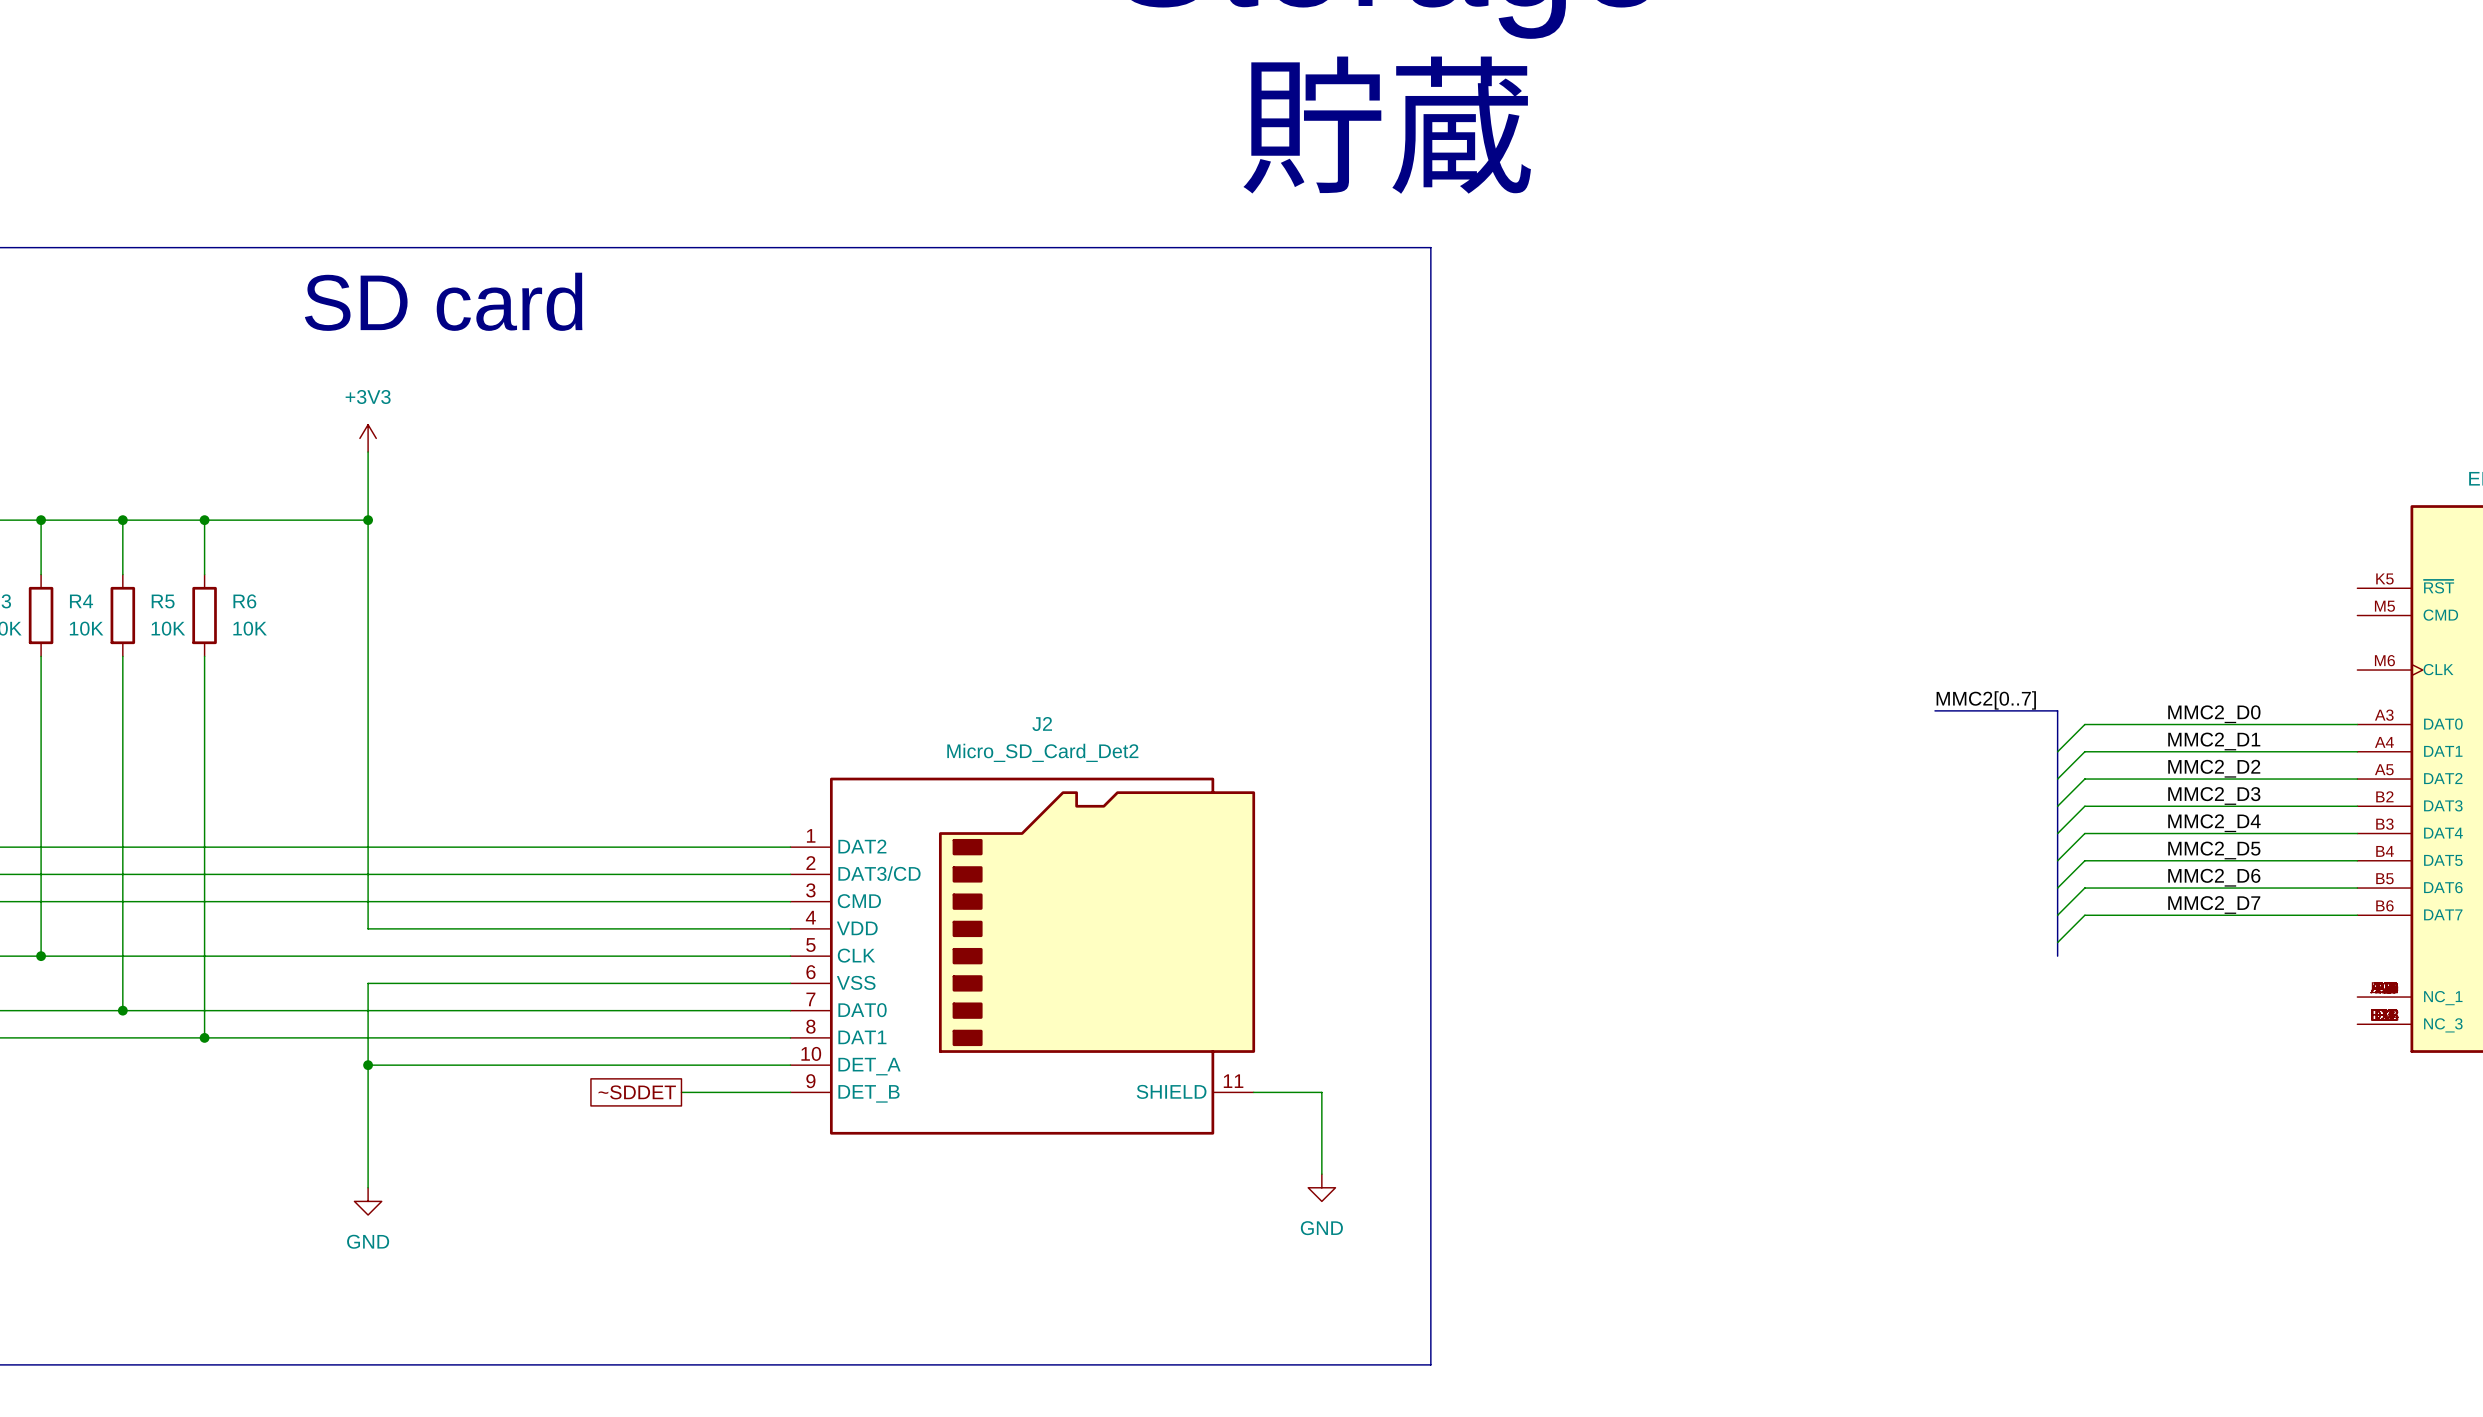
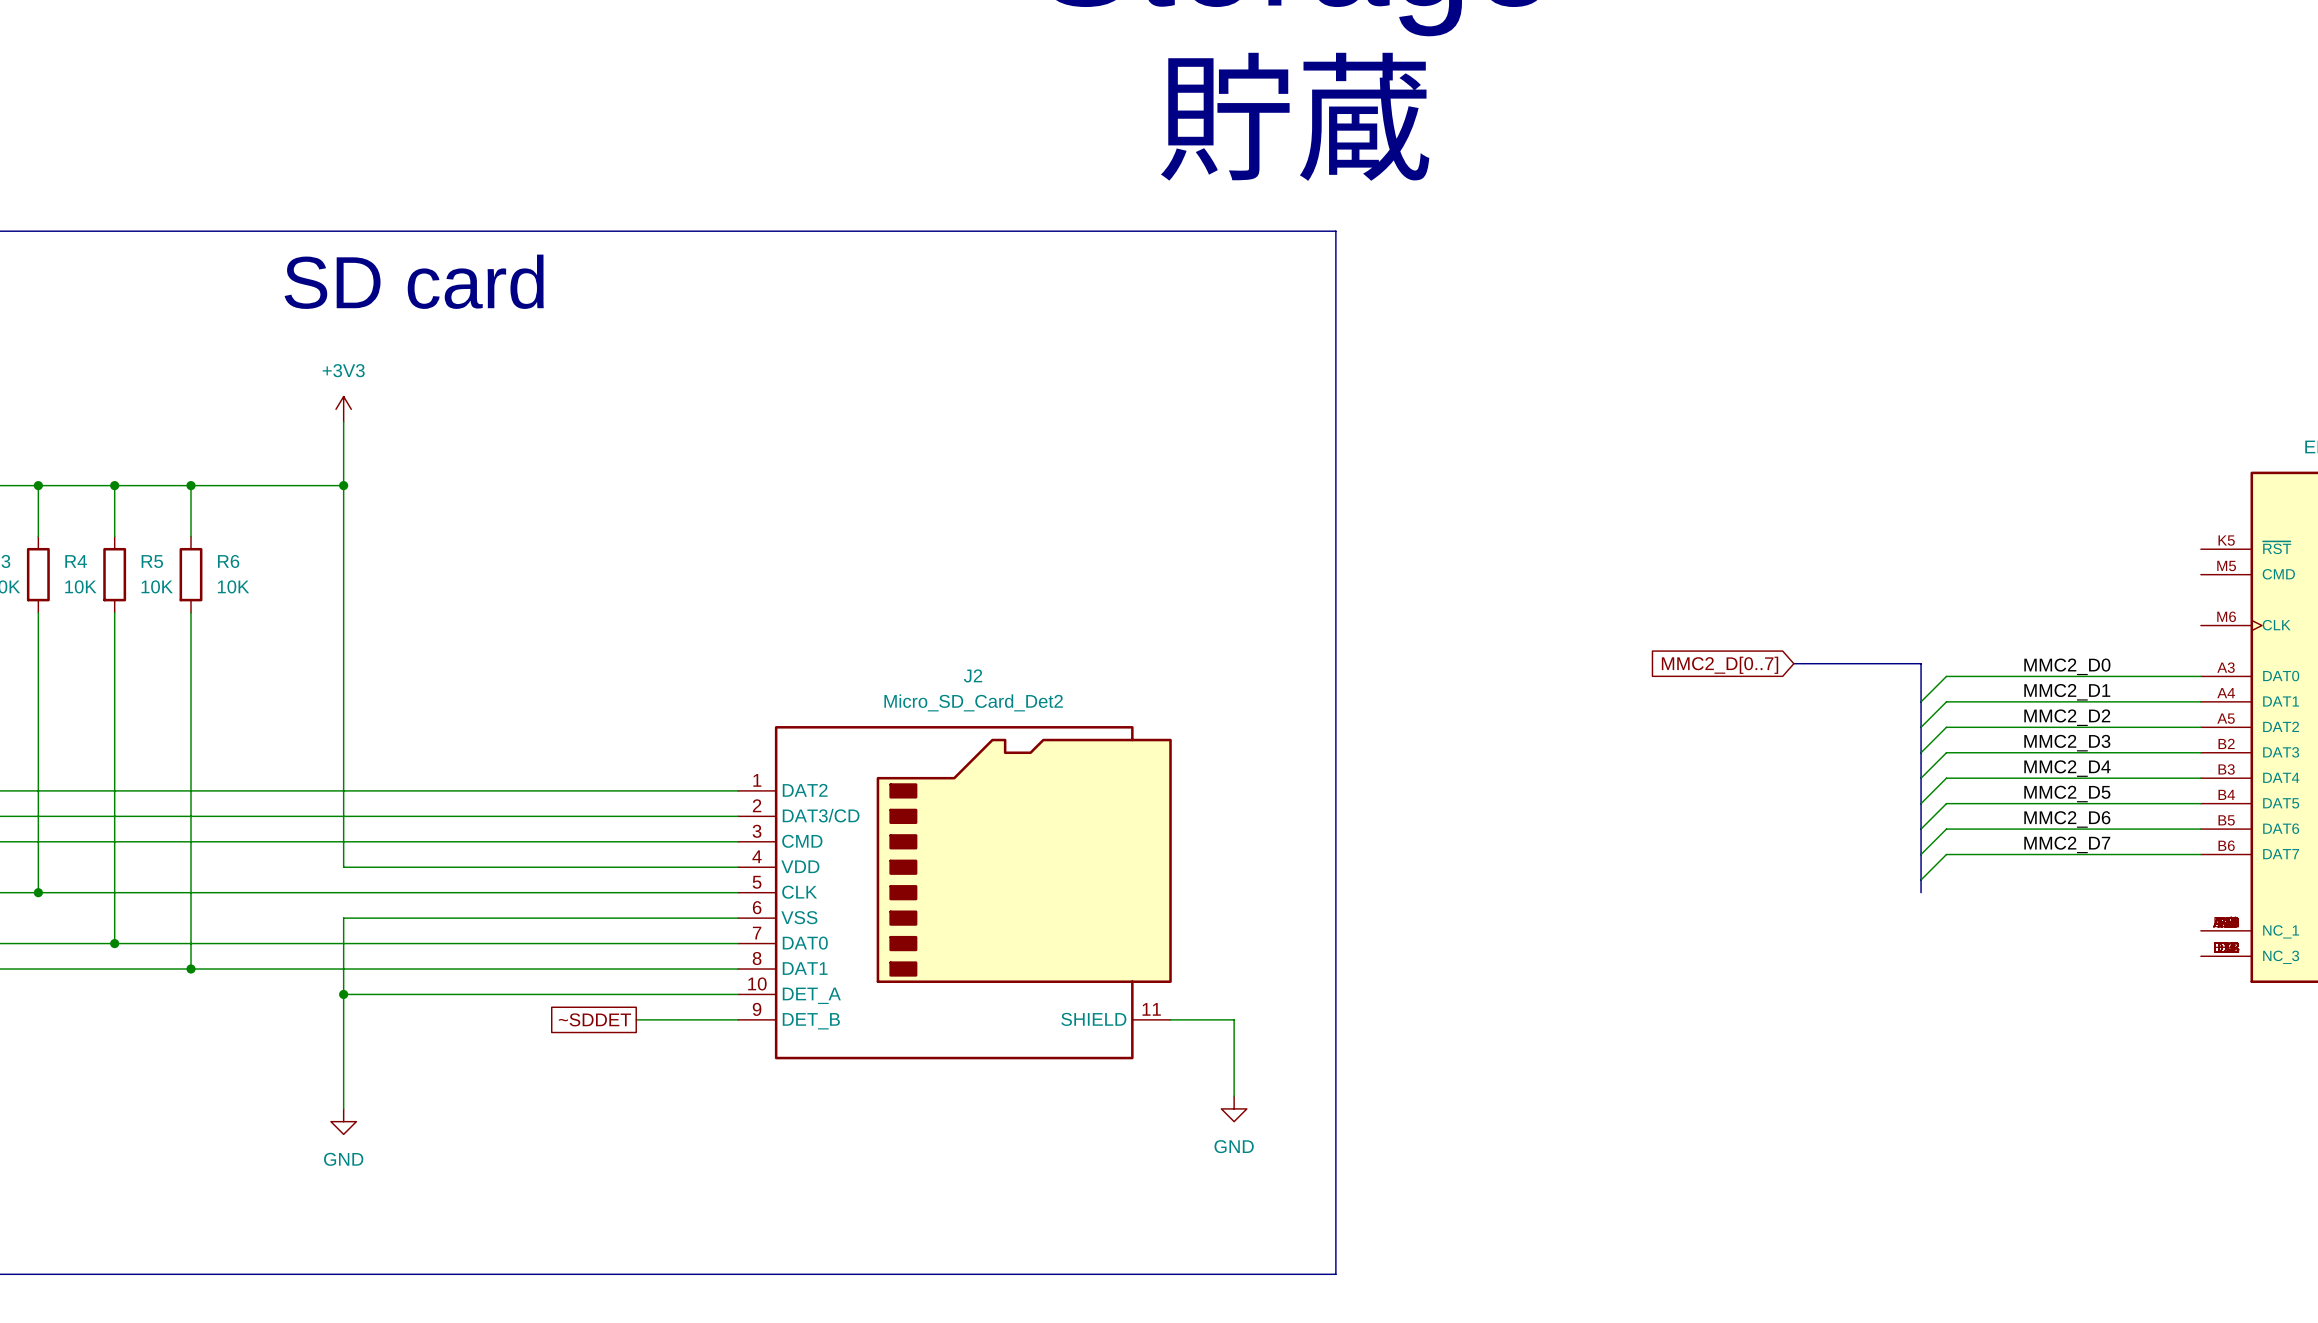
label: MMC2[0..7] (1986, 700) -> none
bus: none -> (1793, 663) (1806, 663)
global label: none -> MMC2_D[0..7] (1720, 665)

